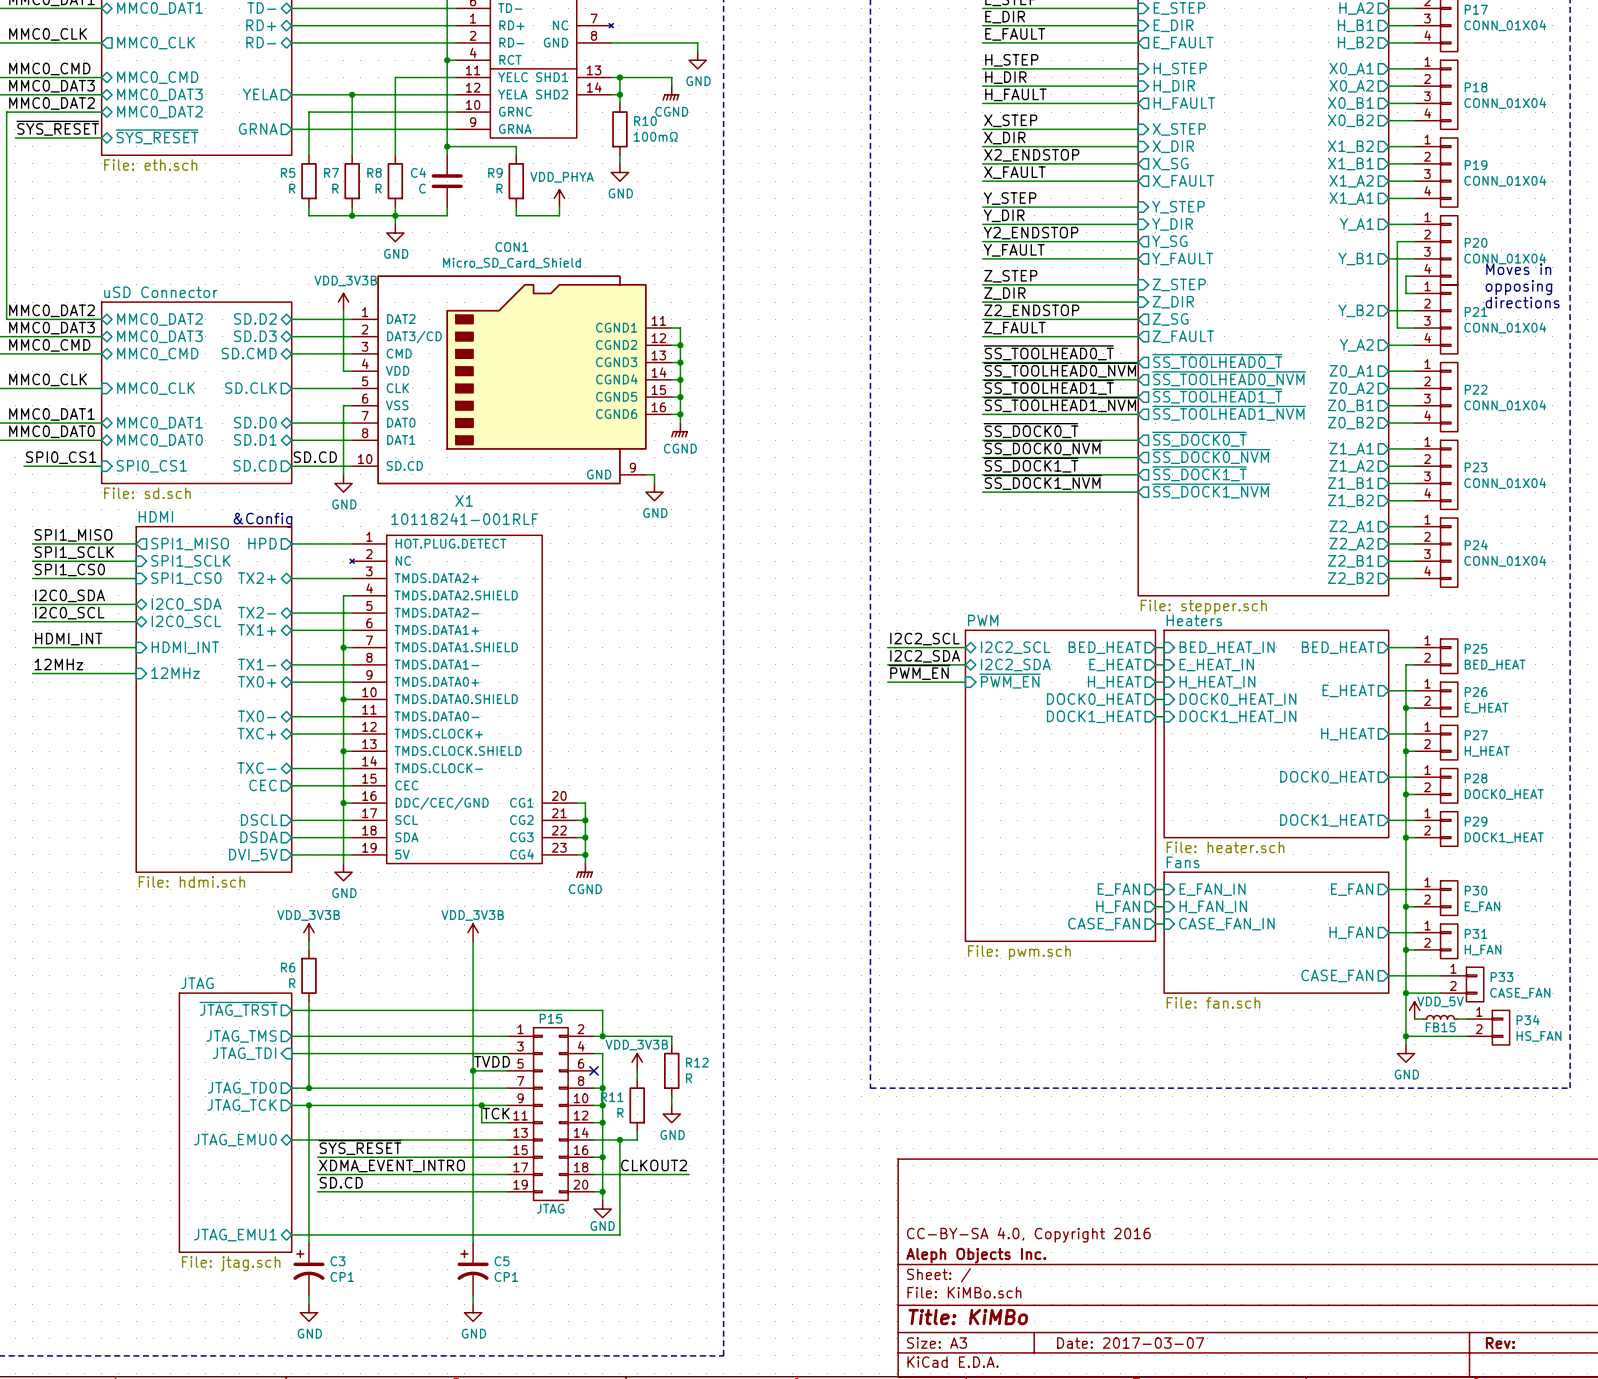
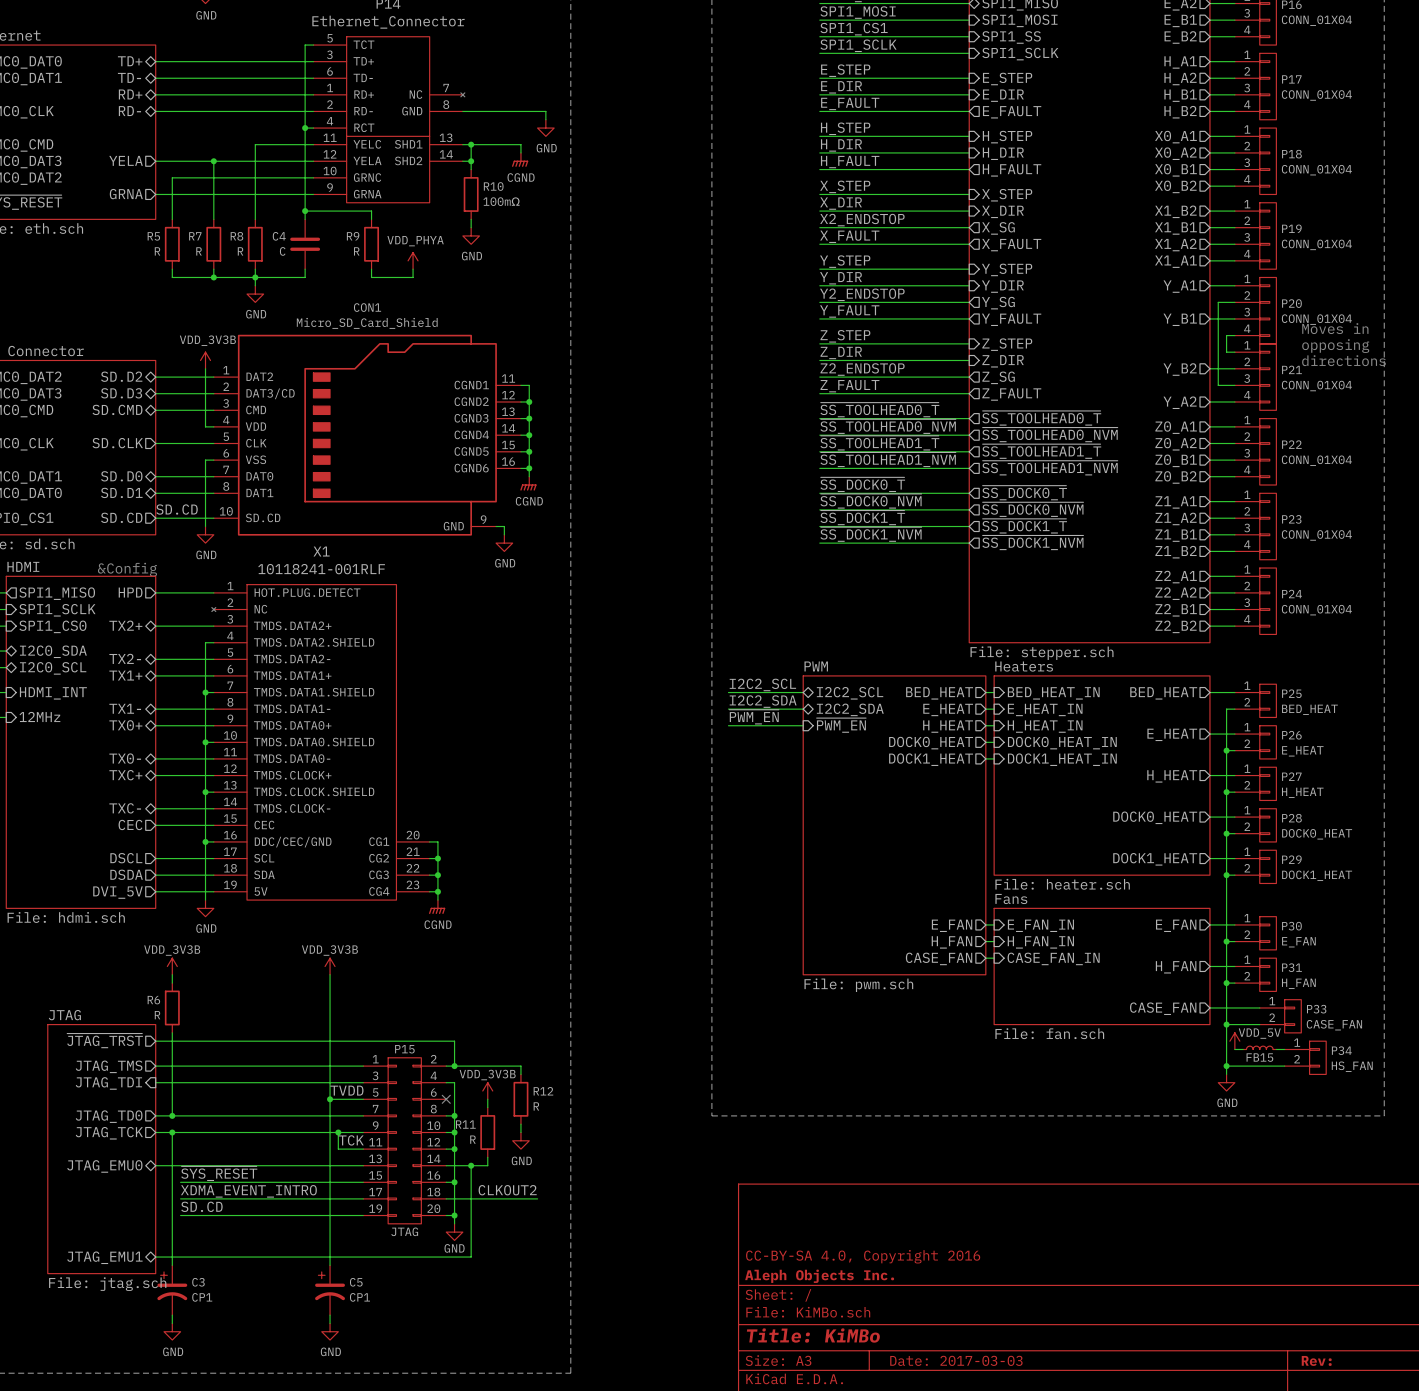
title block: Date: 2017-03-07 (1130, 1343) -> Date: 2017-03-03 (956, 1360)

